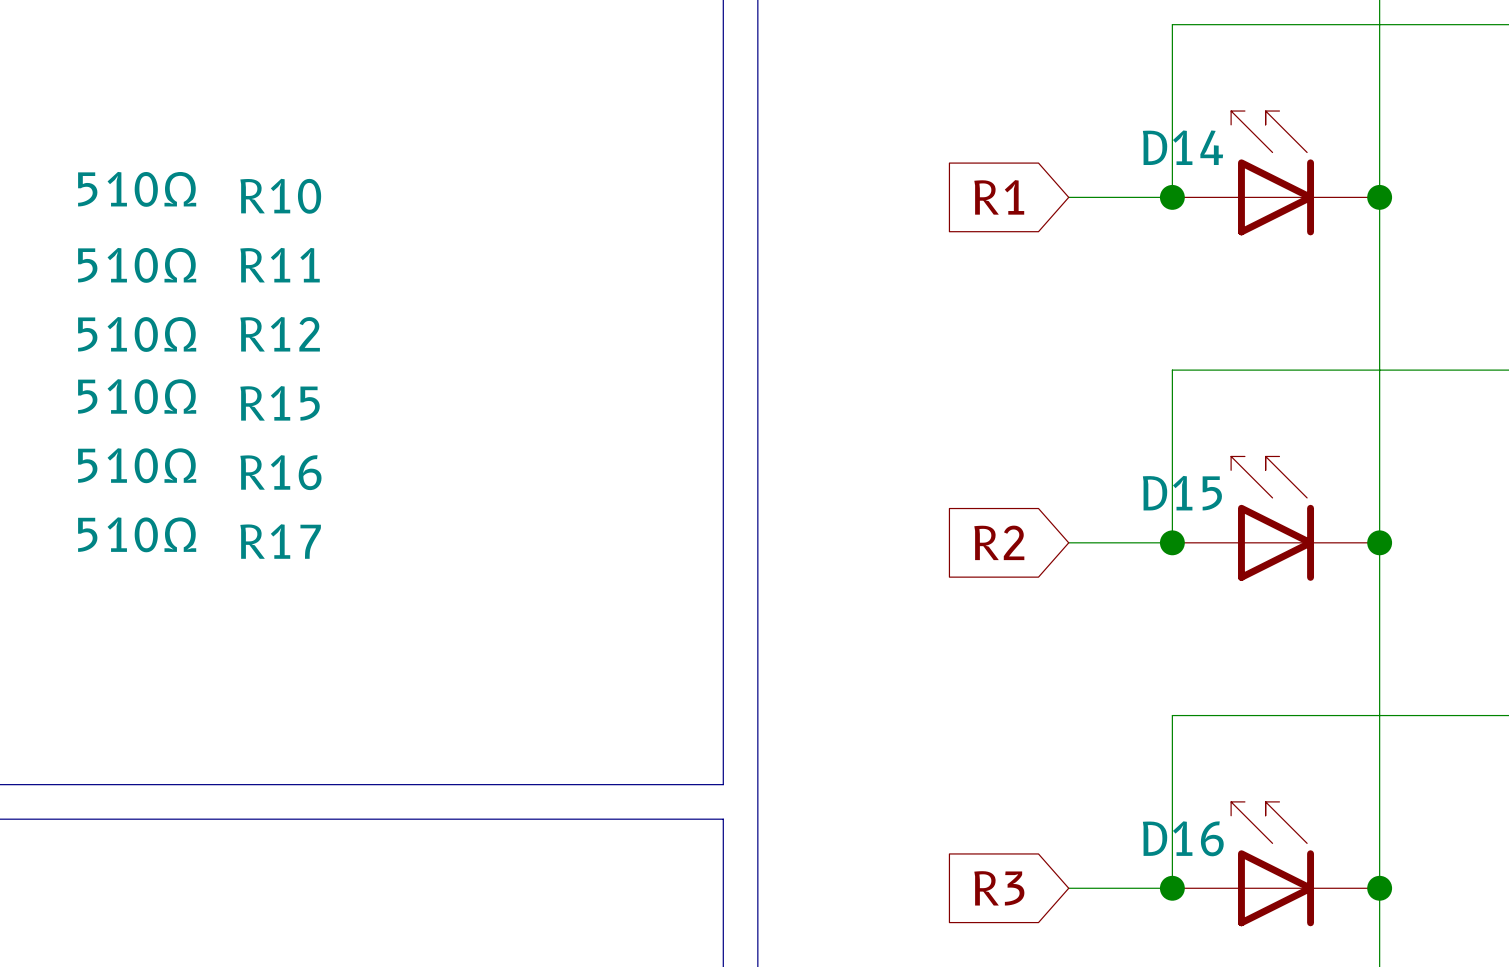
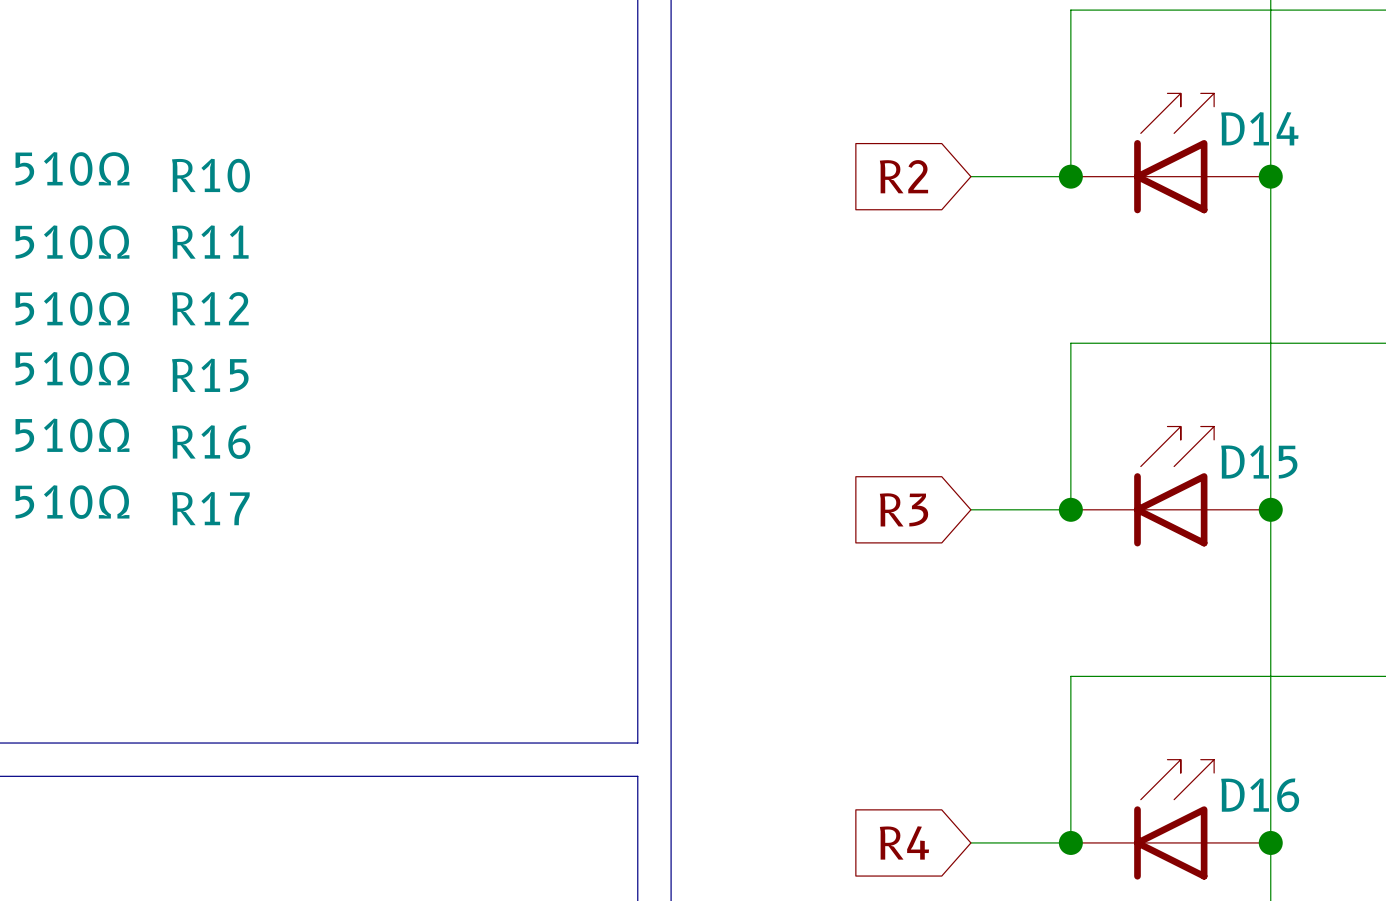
D14 flip: as is (1272, 173) -> left-right (1174, 153)
global label: R1 (999, 197) -> R2 (903, 176)
D15 flip: as is (1272, 518) -> left-right (1174, 486)
global label: R2 (999, 542) -> R3 (903, 509)
D16 flip: as is (1272, 864) -> left-right (1174, 819)
global label: R3 (999, 888) -> R4 (904, 842)

